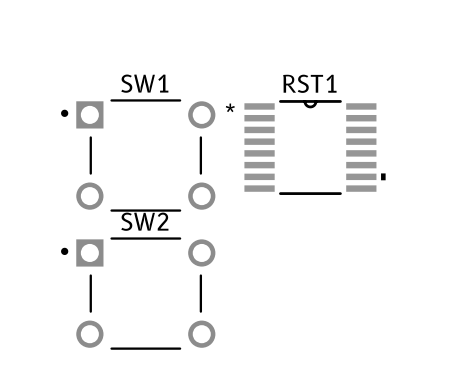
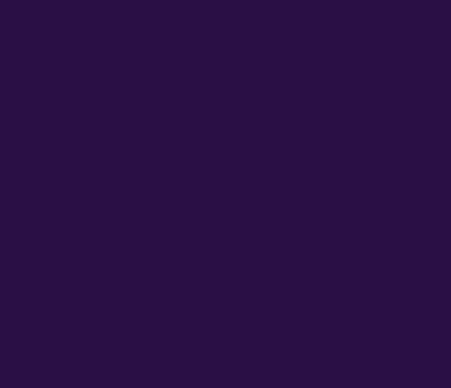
RST1: (315, 147) -> none
SW1: (138, 155) -> none
SW2: (138, 293) -> none

